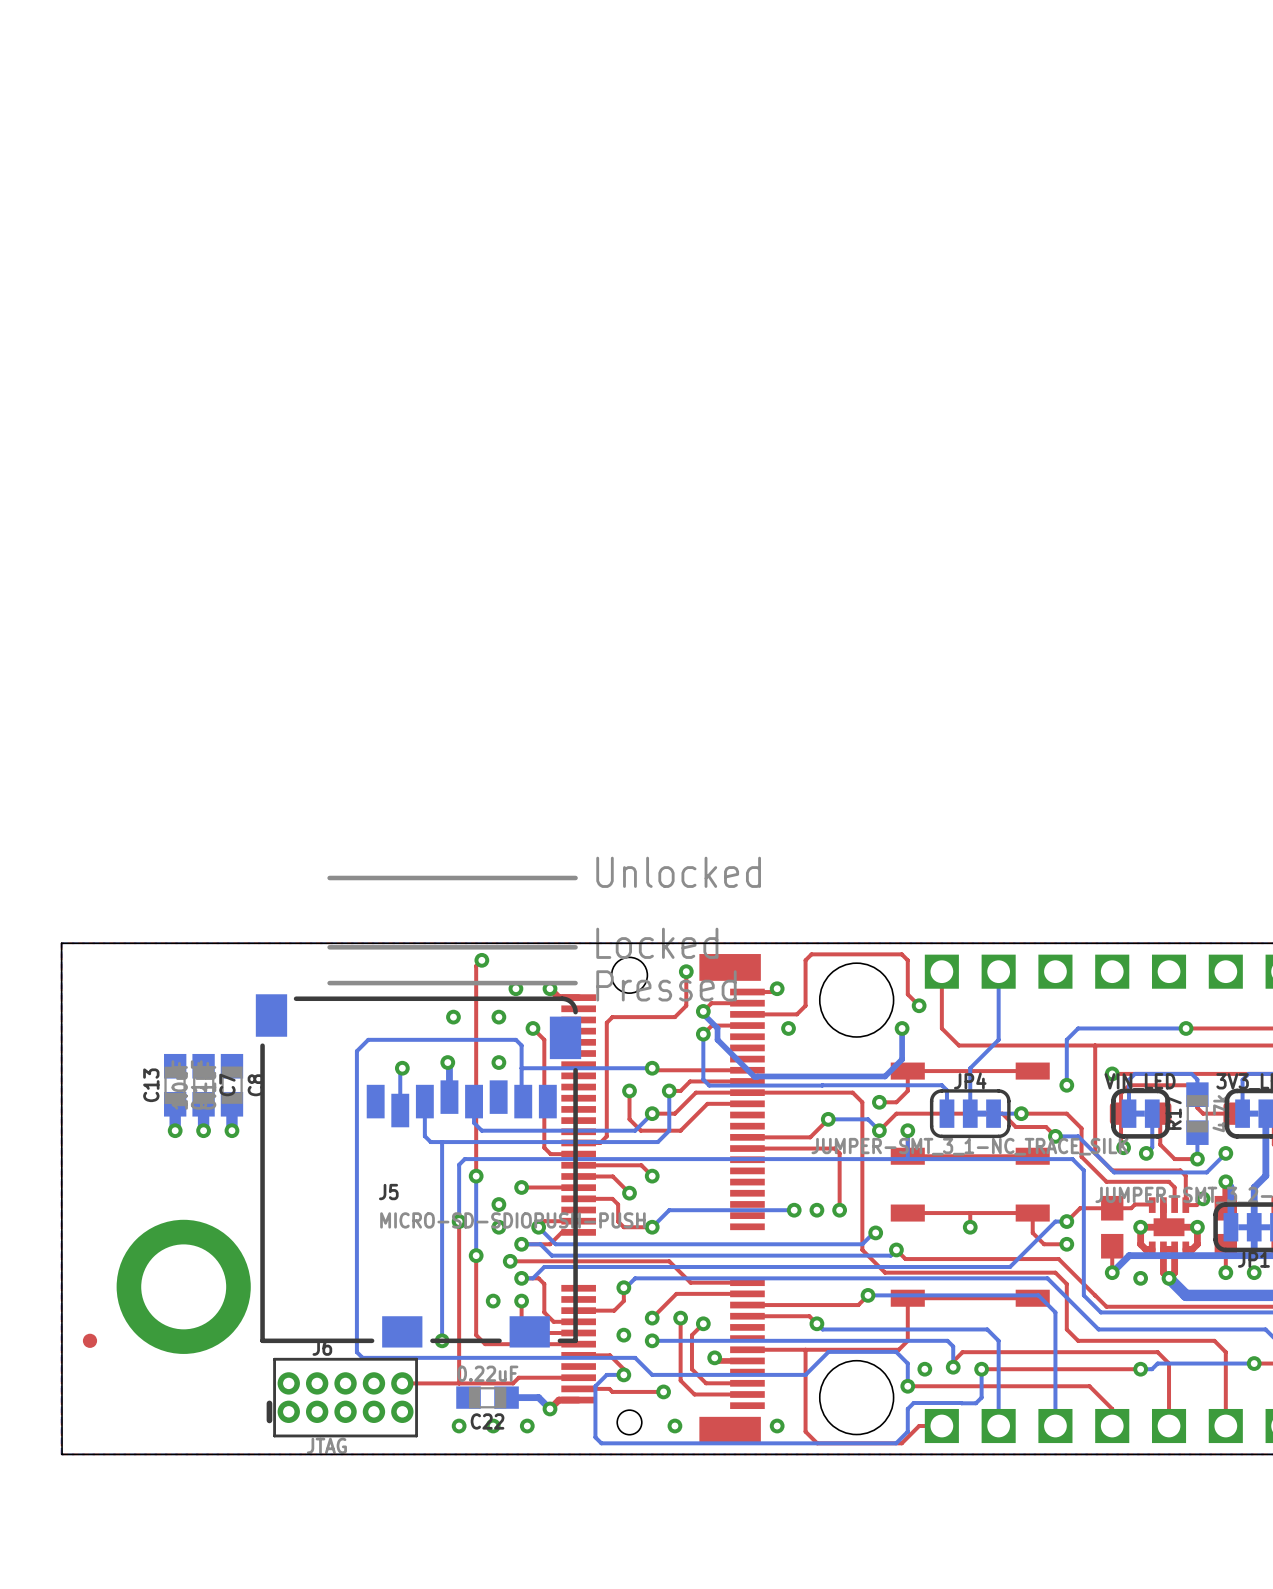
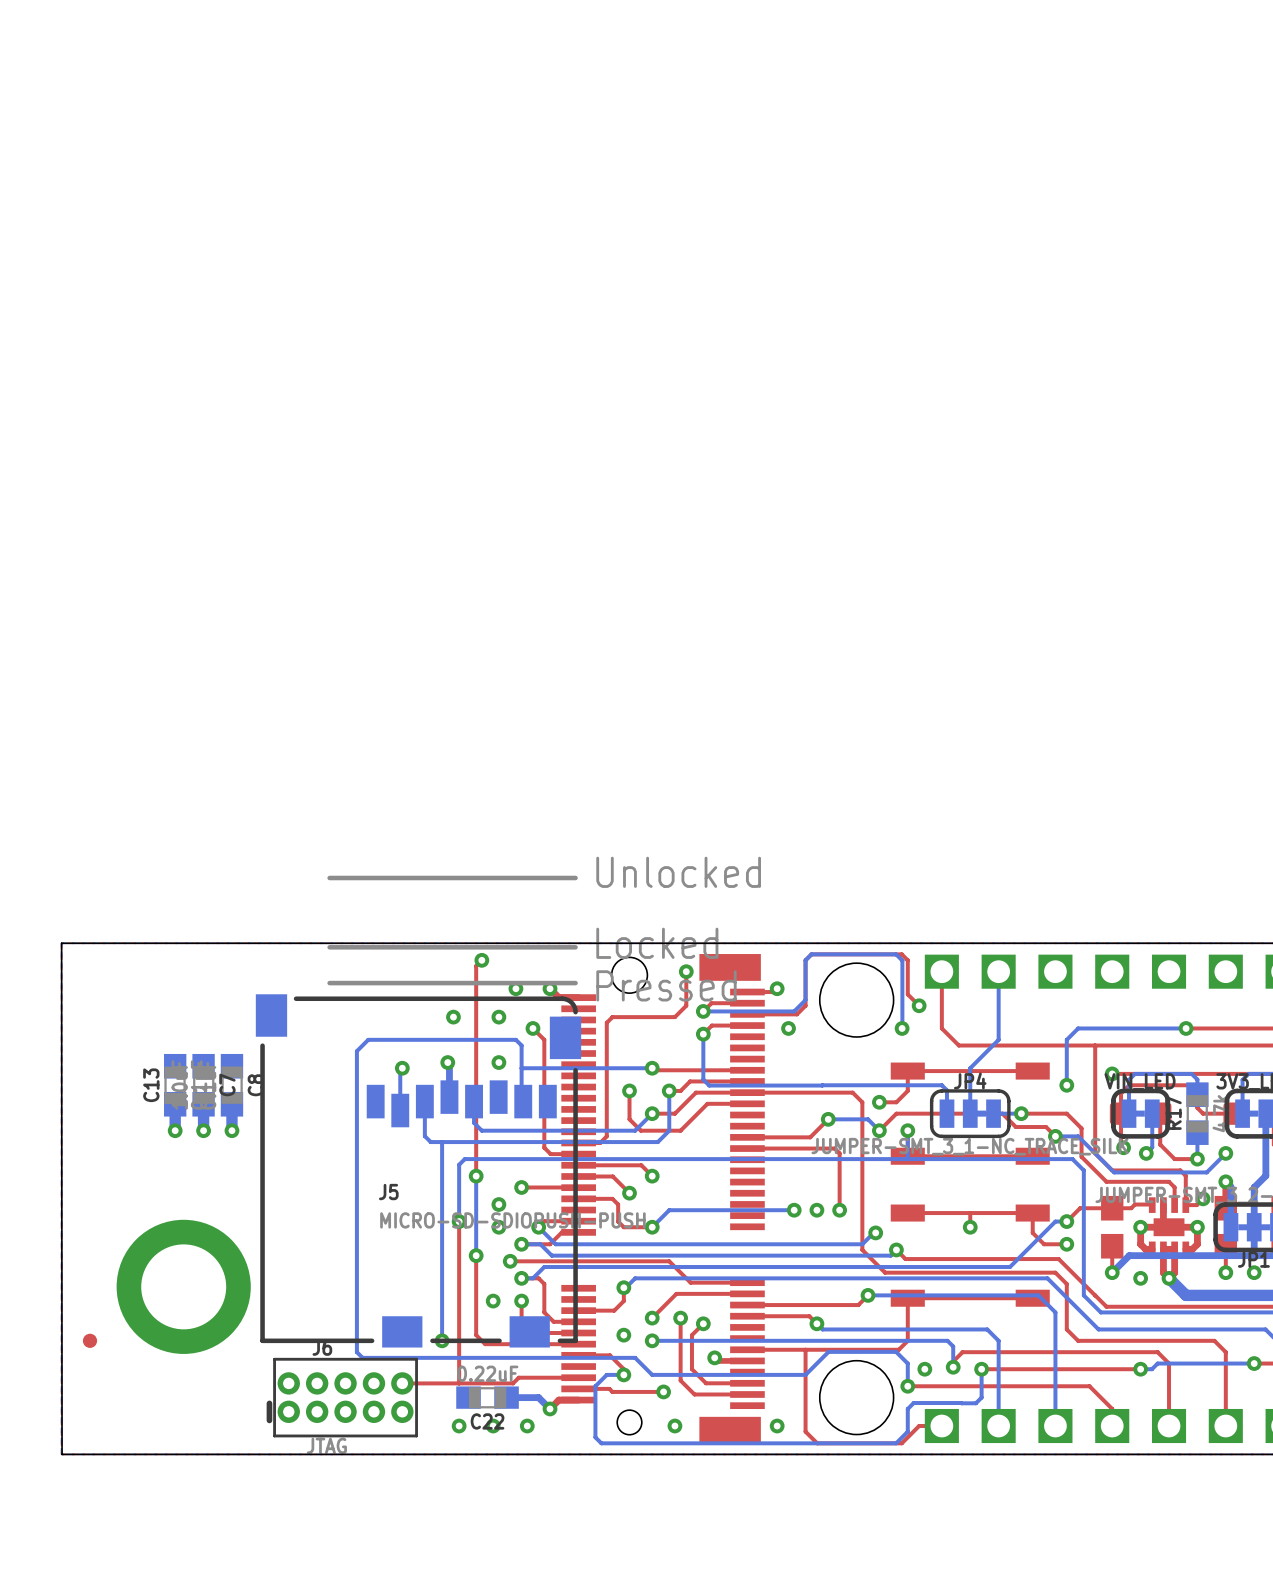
bottom track: (703, 1011) (703, 1014) (717, 1028) (717, 1039) (754, 1076) (757, 1076) -> none
bottom track: (902, 1028) (902, 1059) (885, 1076) (757, 1076) -> (902, 1028) (902, 960) (896, 954) (811, 954) (805, 960) (805, 1000) (794, 1011) (703, 1011)

